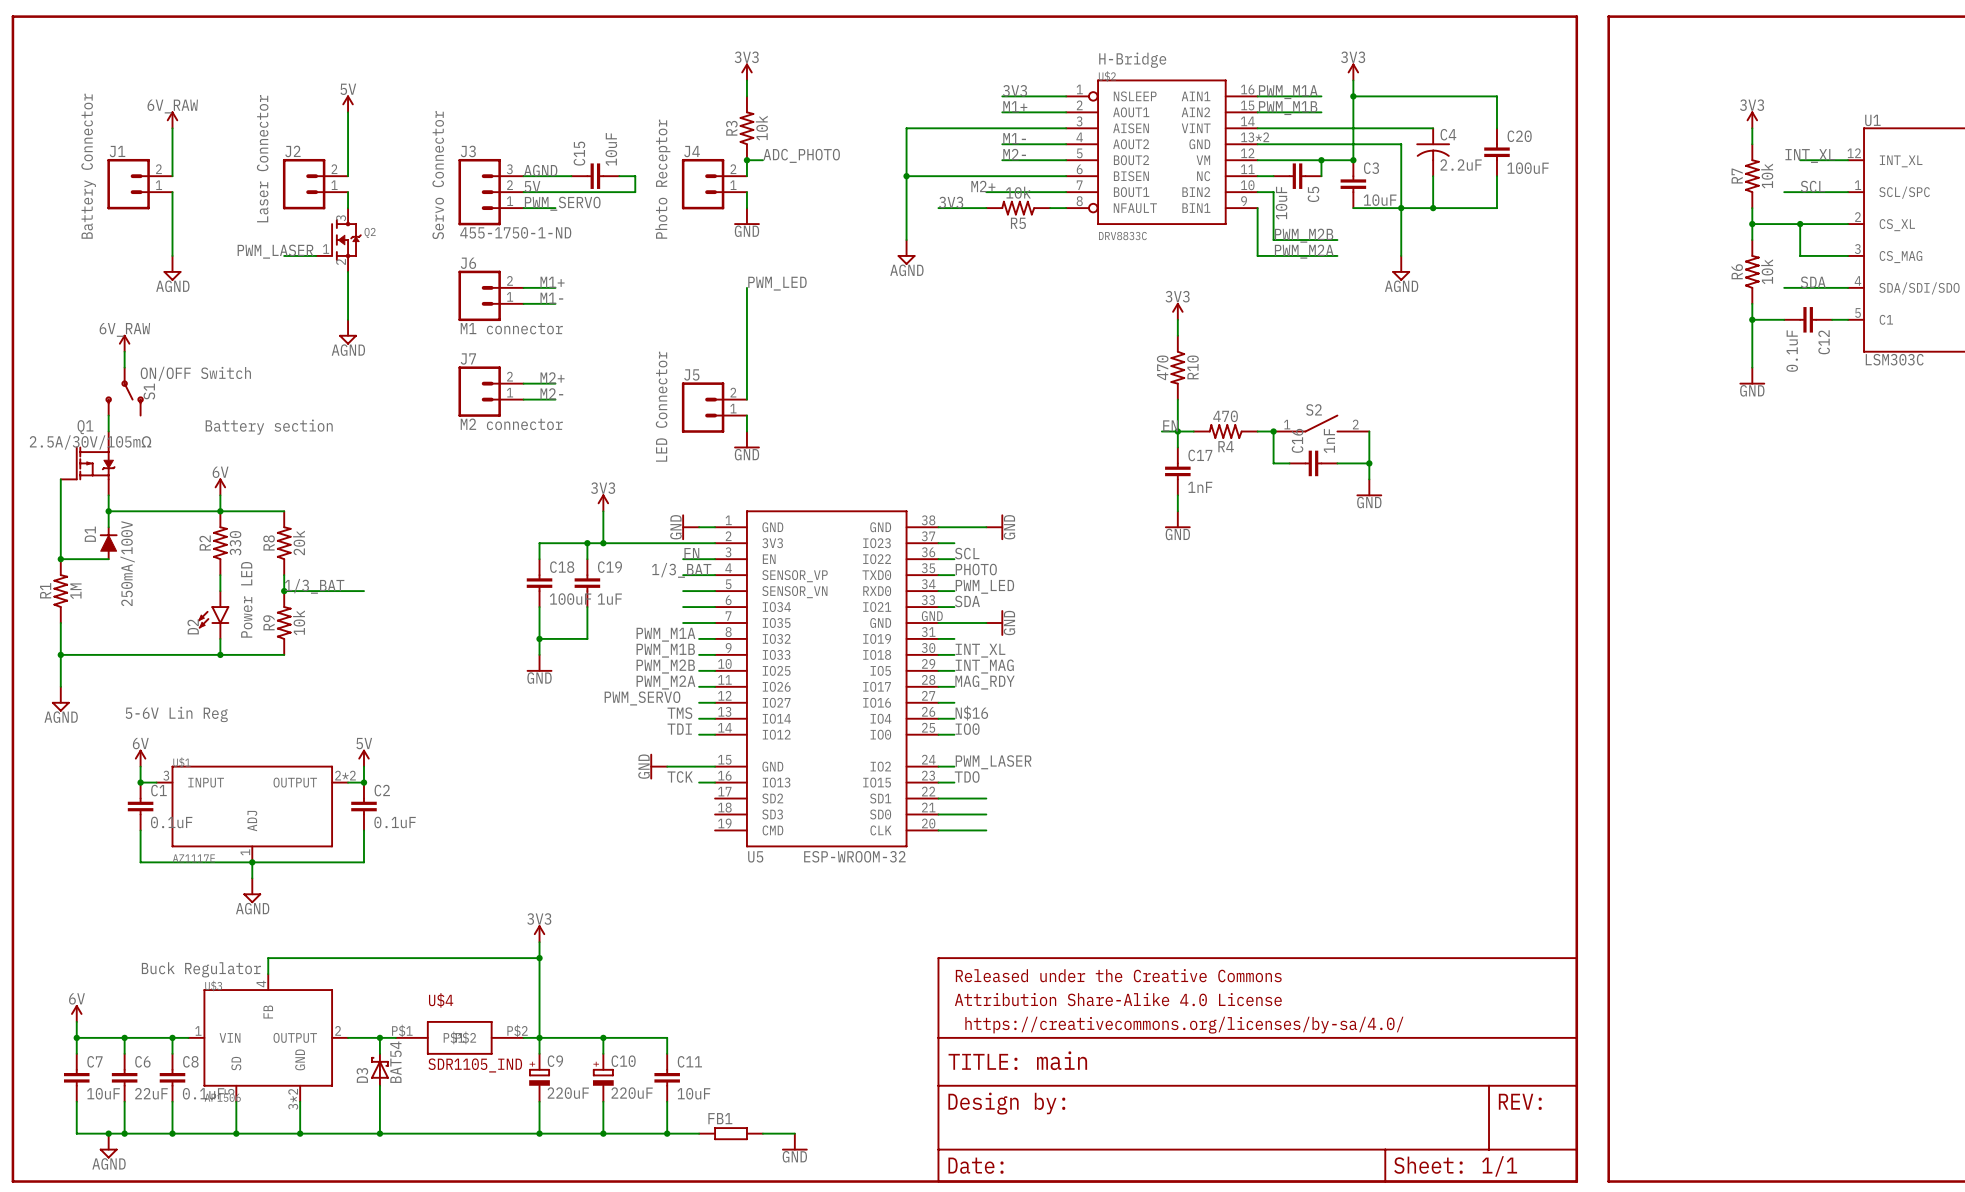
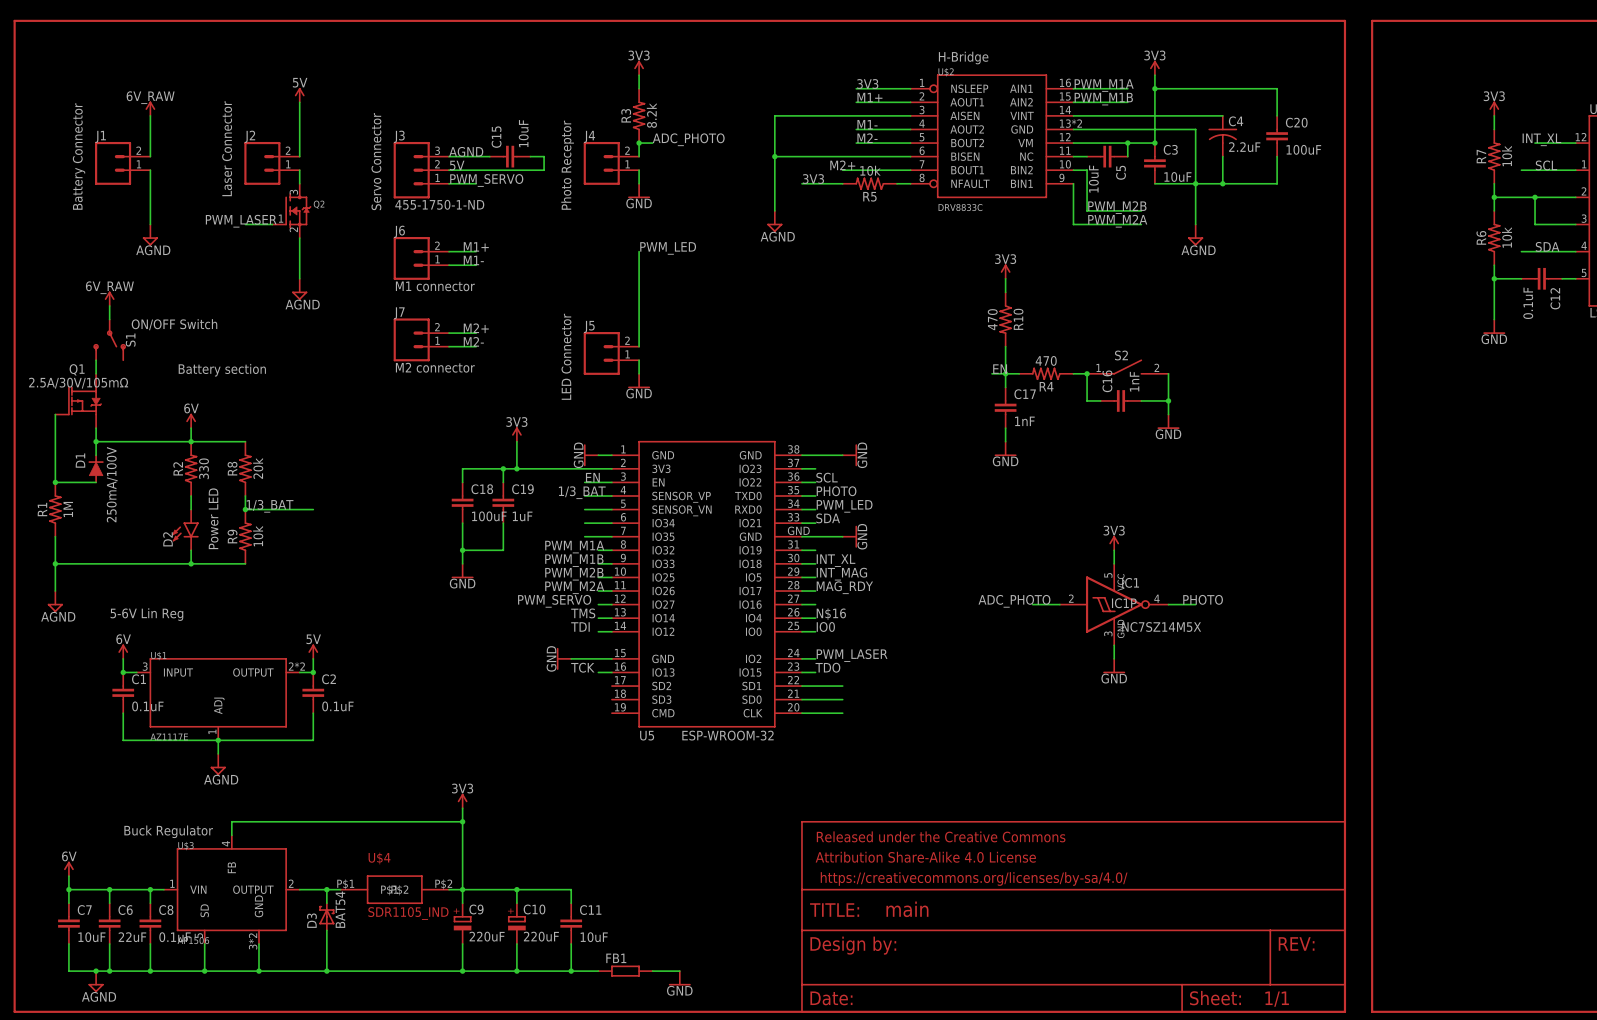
R3 value: 10k (761, 128) -> 8.2k (651, 115)
power symbol: none -> 3V3 (1114, 543)
wire: none -> (1114, 550) (1114, 563)
label: none -> PHOTO (1203, 599)
label: none -> ADC_PHOTO (1014, 601)
wire: none -> (1032, 604) (1059, 604)
IC1: none -> NC7SZ14M5X (1114, 604)
IC1P: none -> (1114, 604)
wire: none -> (1168, 604) (1195, 604)
wire: none -> (1114, 645) (1114, 658)
power symbol: none -> GND (1114, 666)

